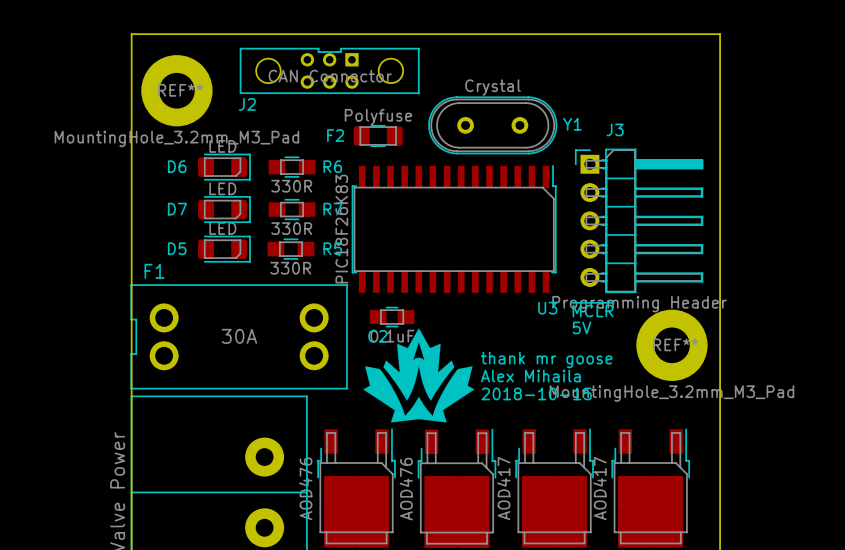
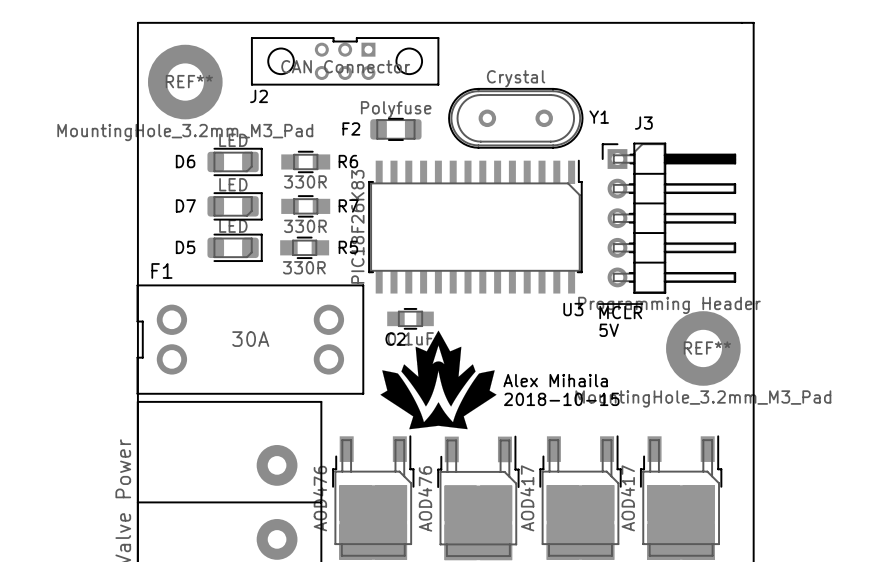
text: thank mr goose (546, 359) -> none

